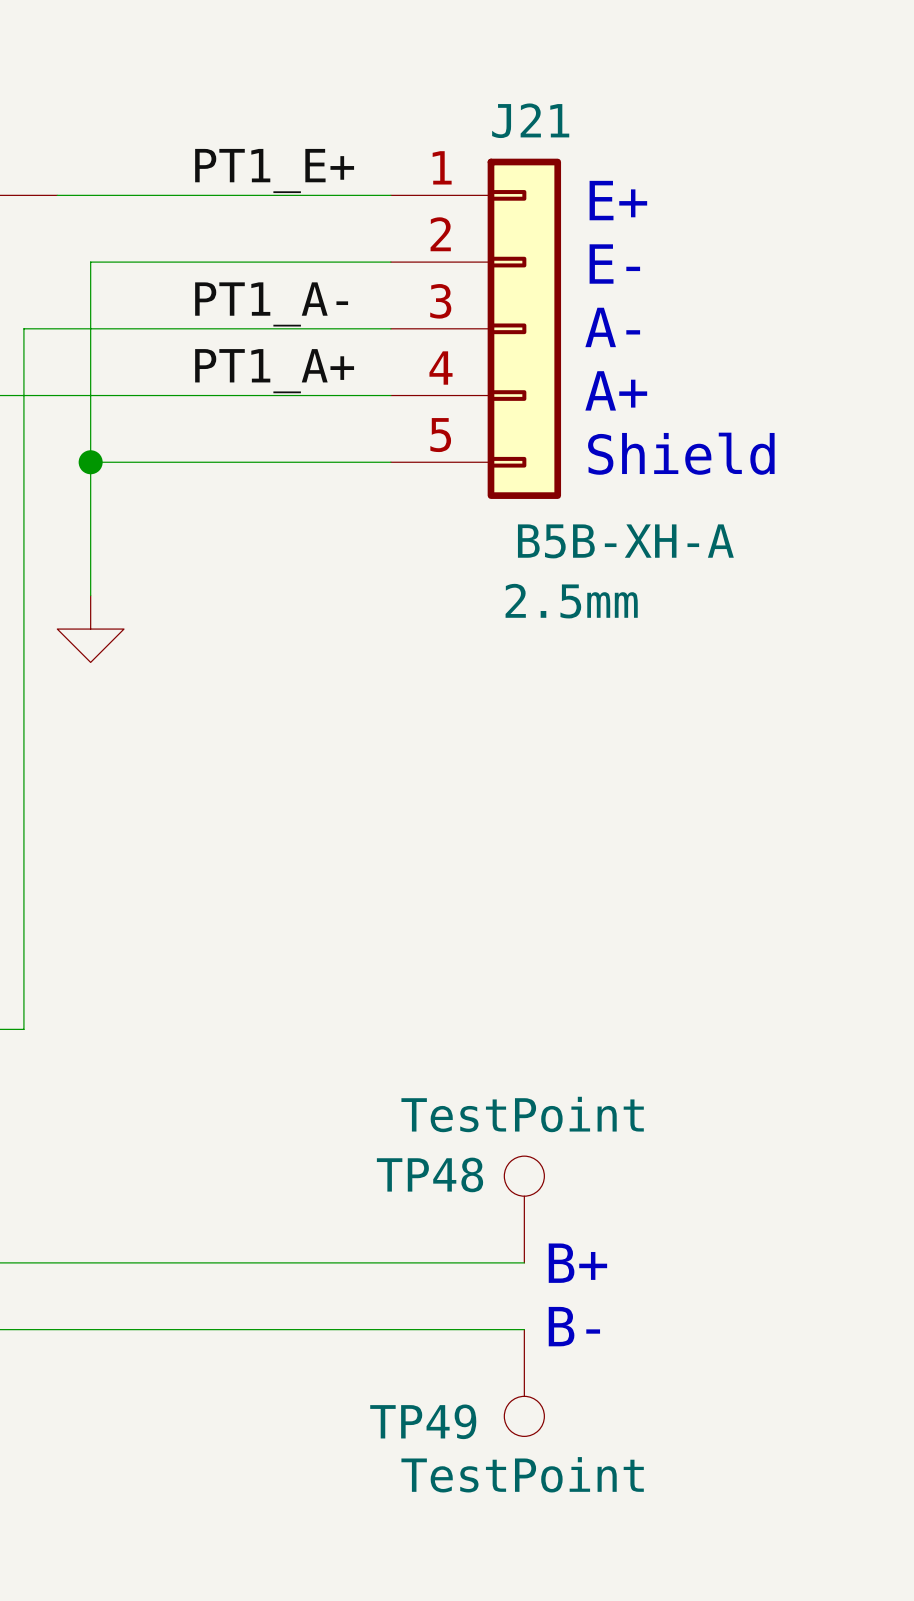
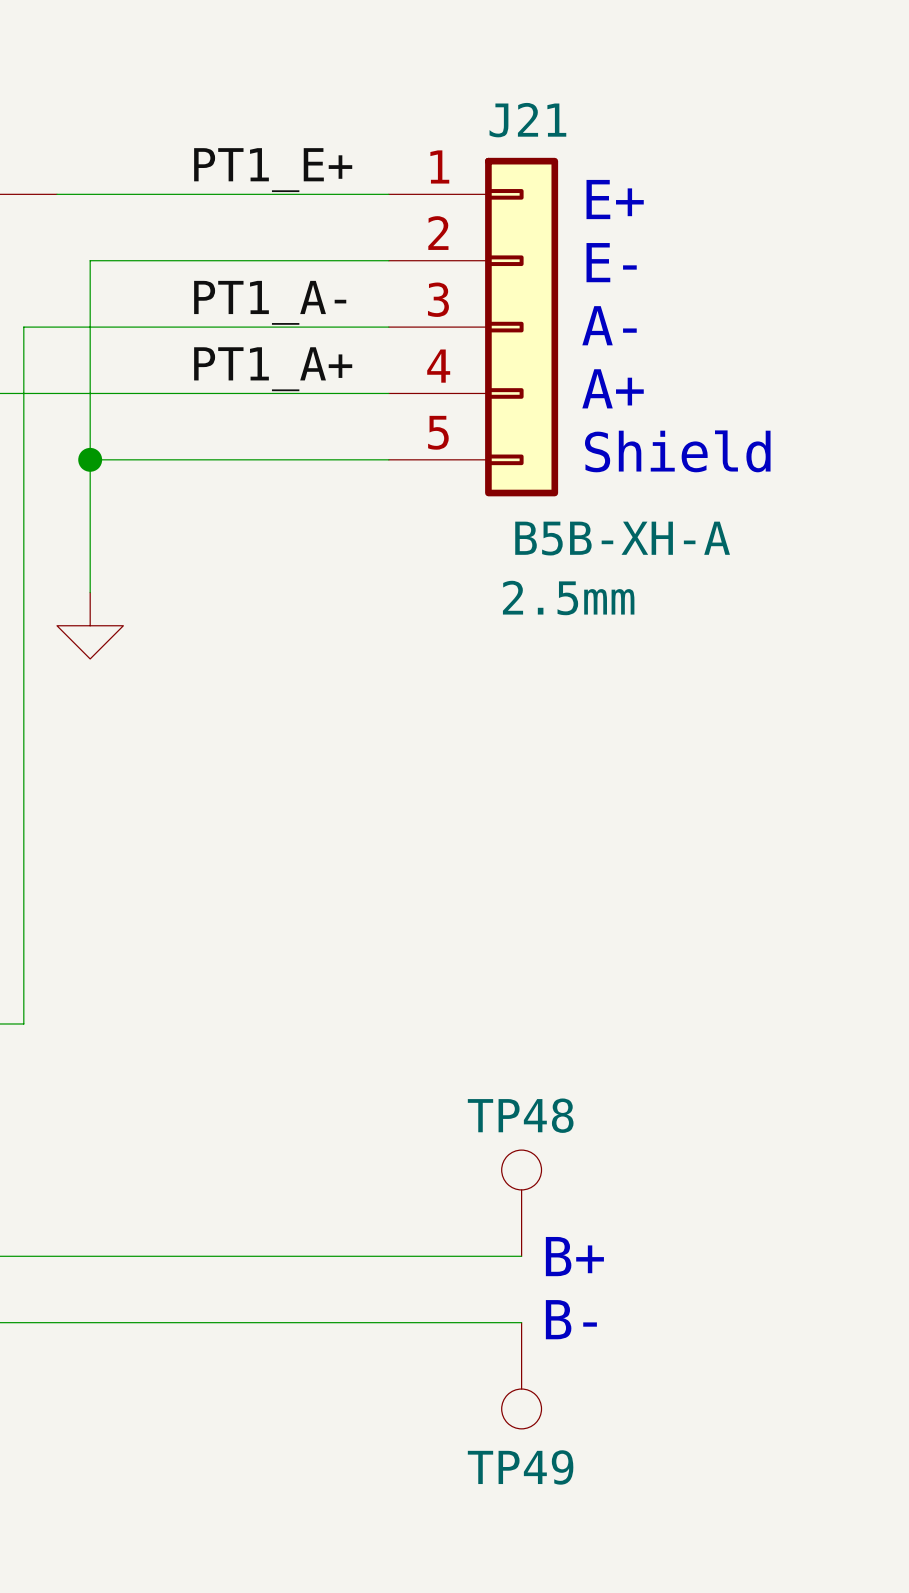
TP48 value: TestPoint (522, 1114) -> none
TP48 name position: TP48 (430, 1174) -> TP48 (520, 1115)
TP49 name position: TP49 (423, 1421) -> TP49 (520, 1467)
TP49 value: TestPoint (522, 1474) -> none

